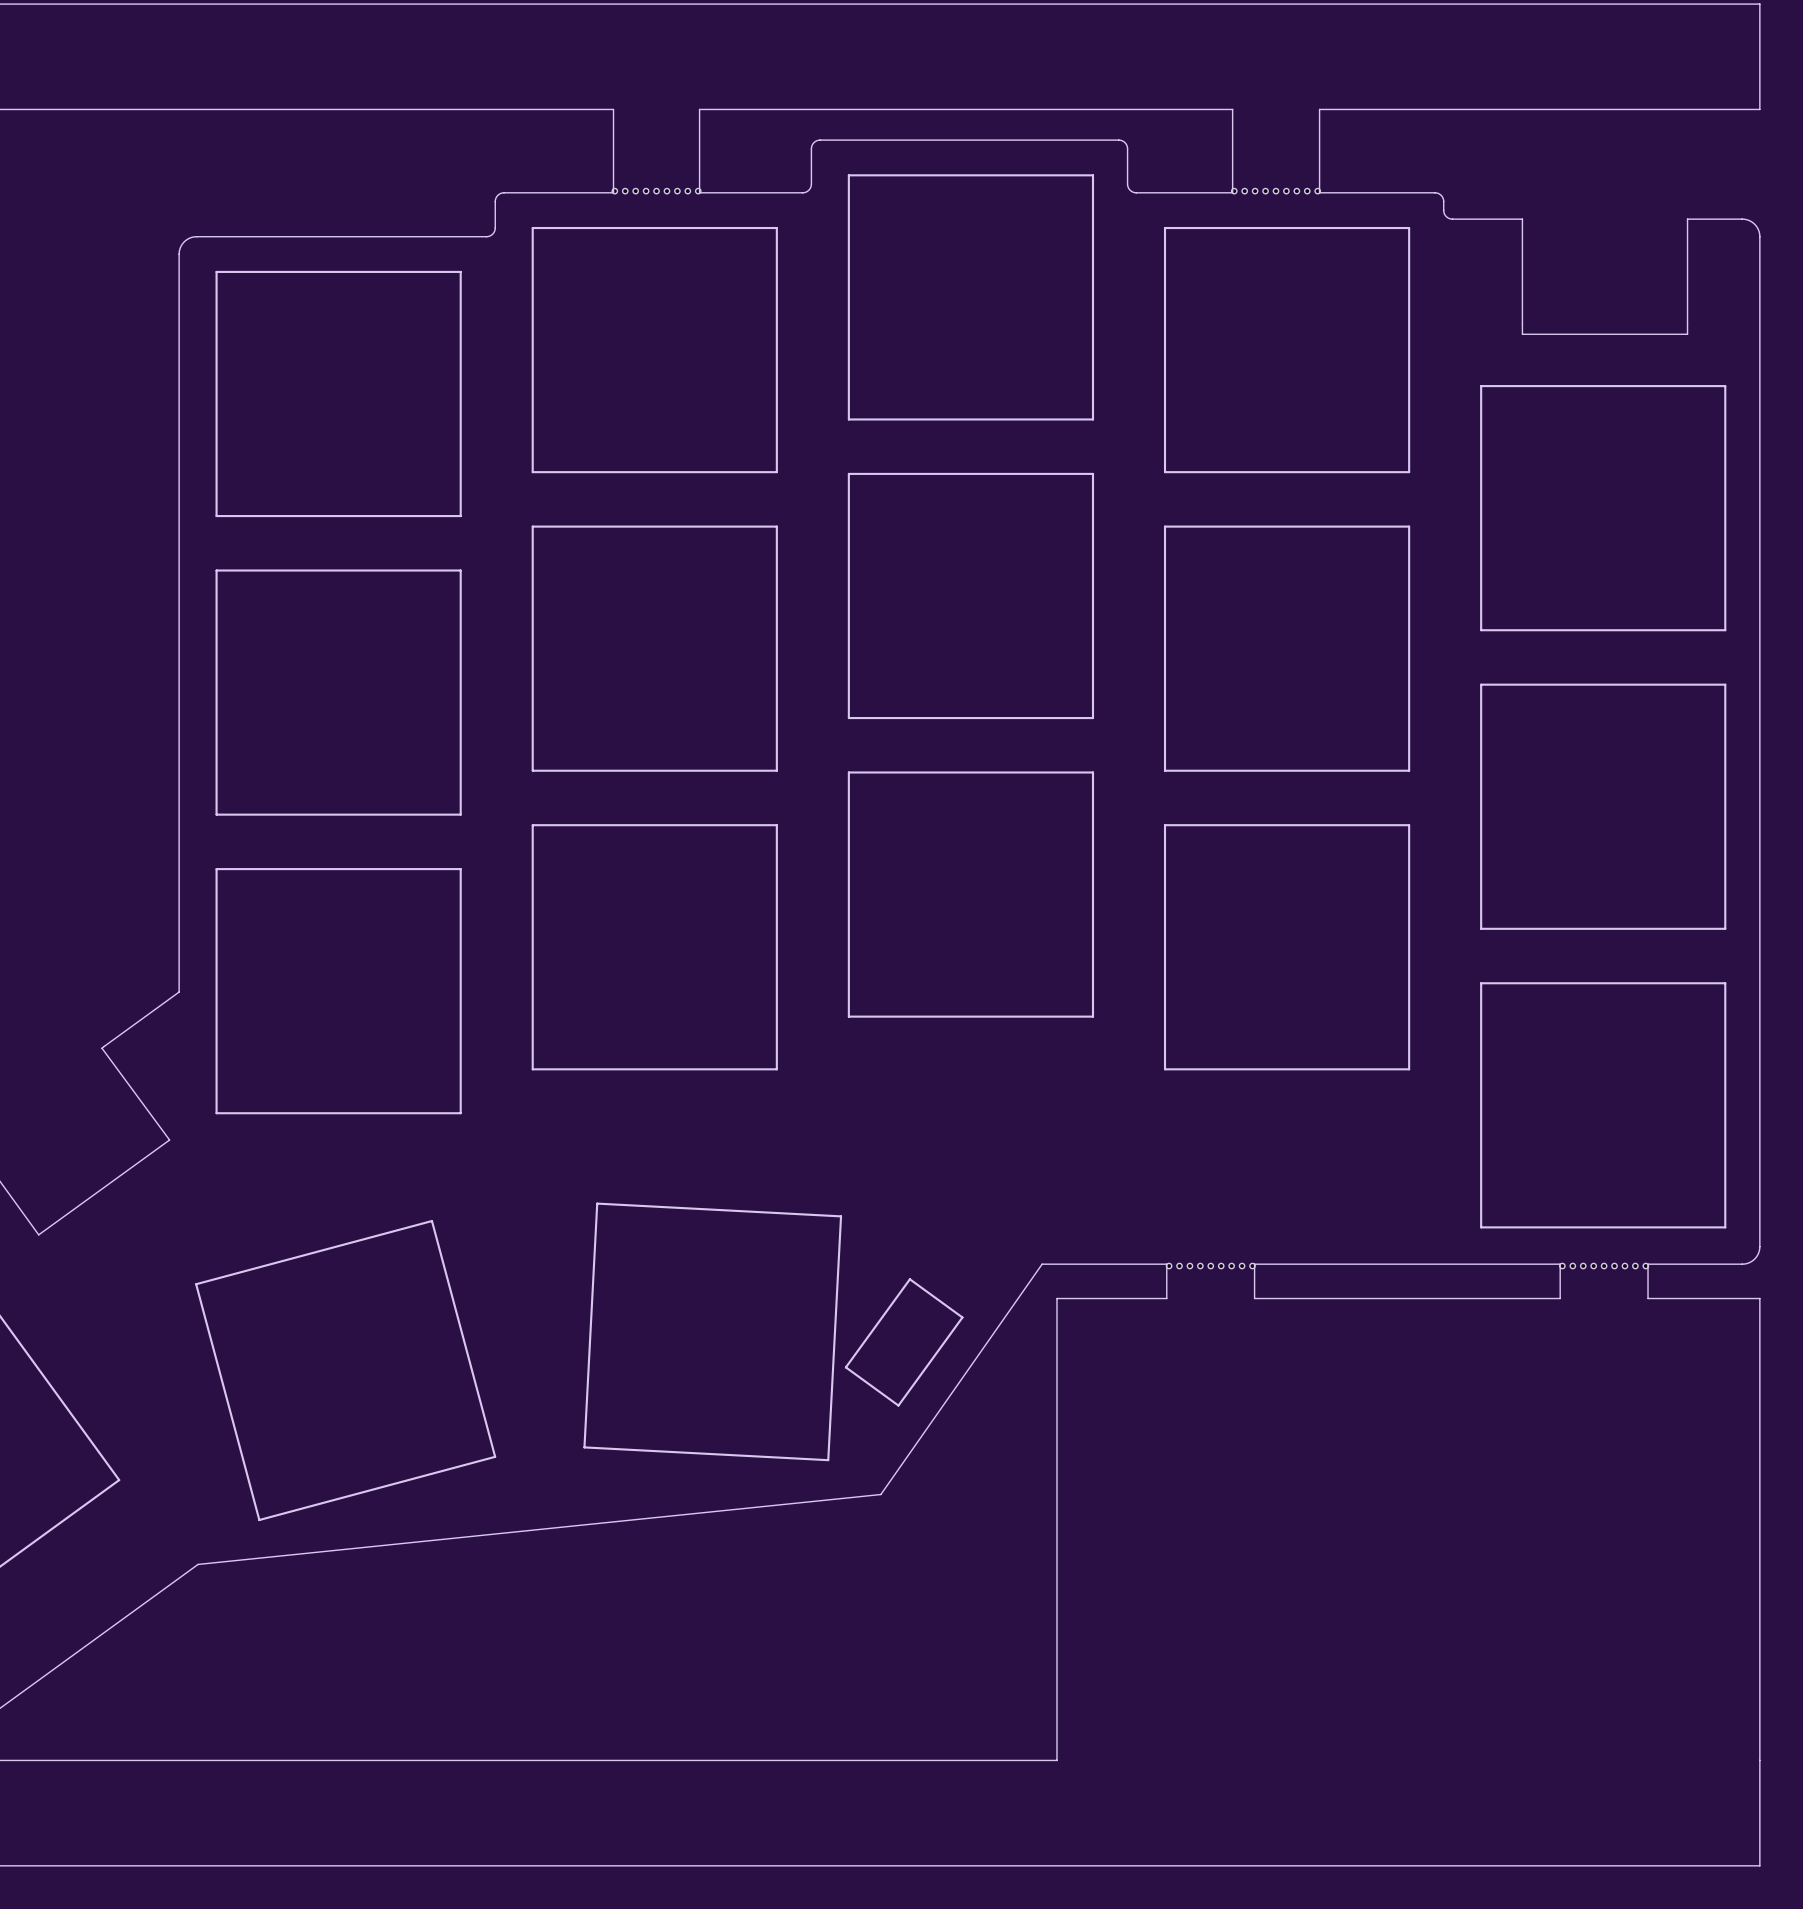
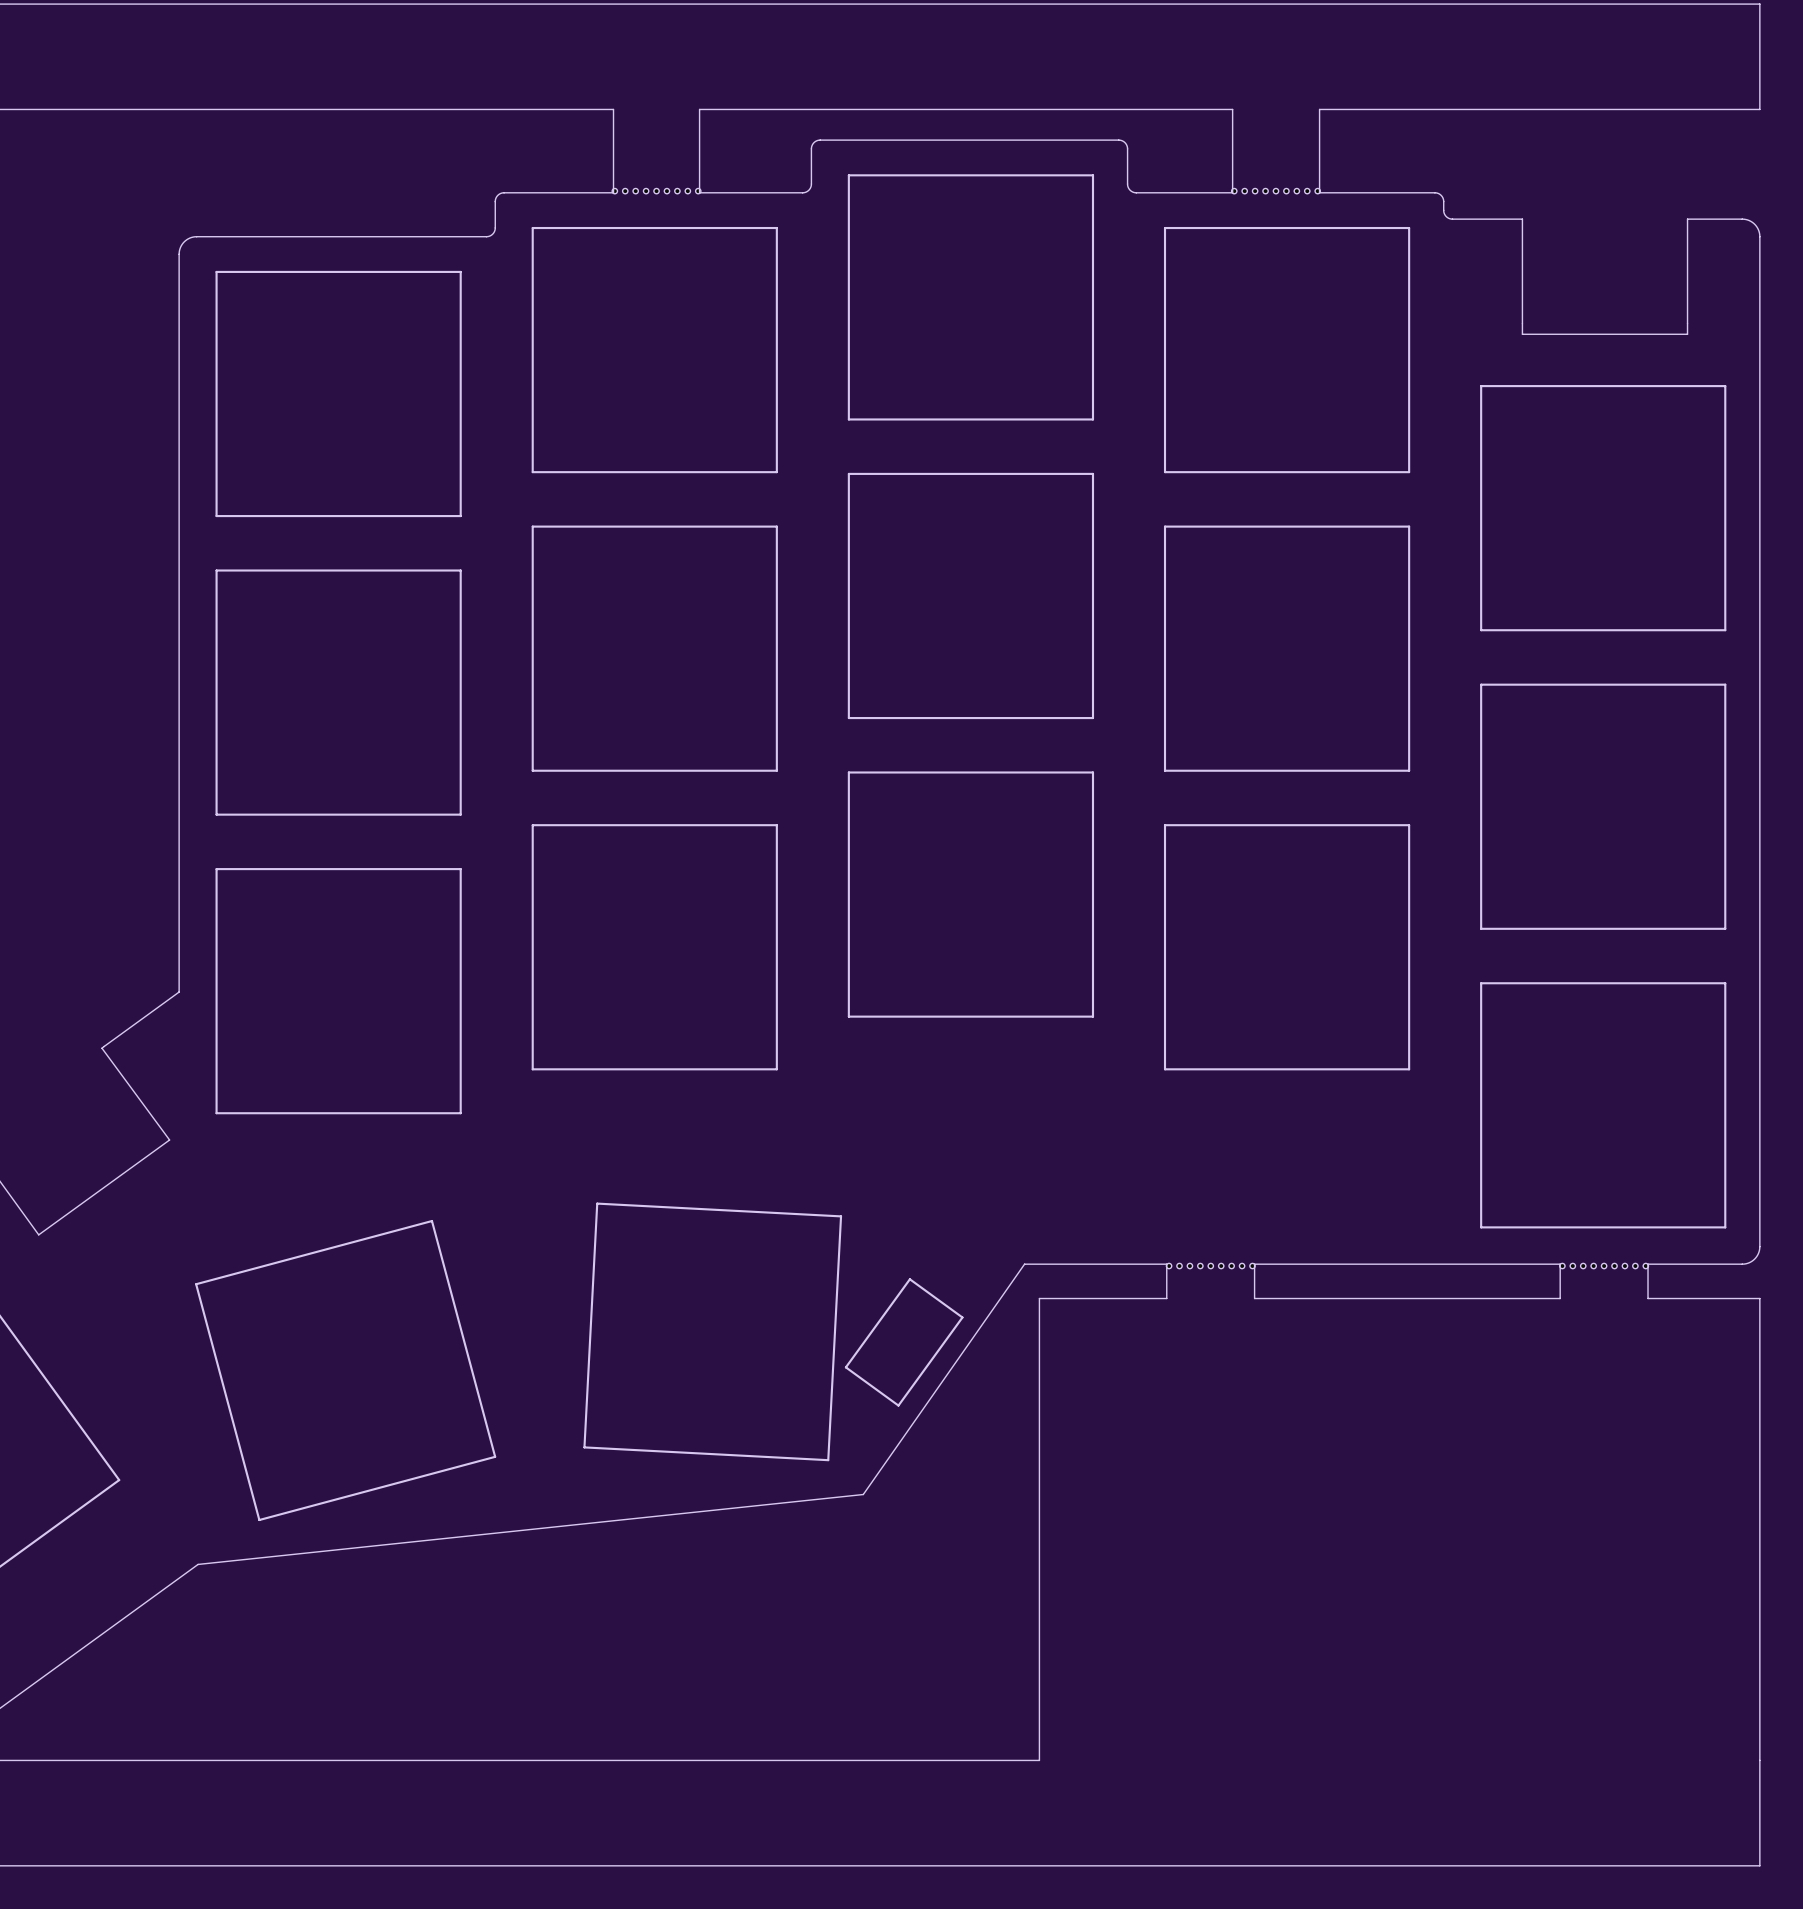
board edge: (1042, 1264) (880, 1494) (198, 1564) -> (1042, 1264) (1024, 1264) (863, 1494) (198, 1564)
board edge: (1056, 1298) (1056, 1760) (1039, 1760) -> (1056, 1298) (1039, 1298) (1039, 1760)

